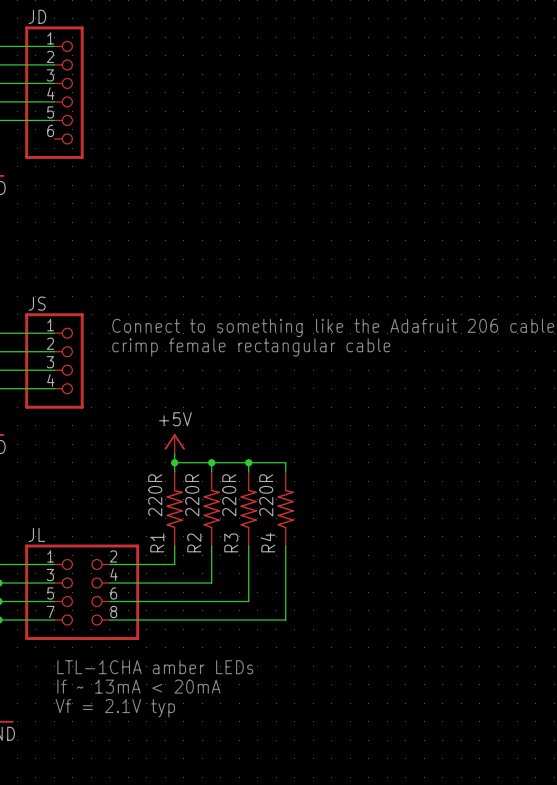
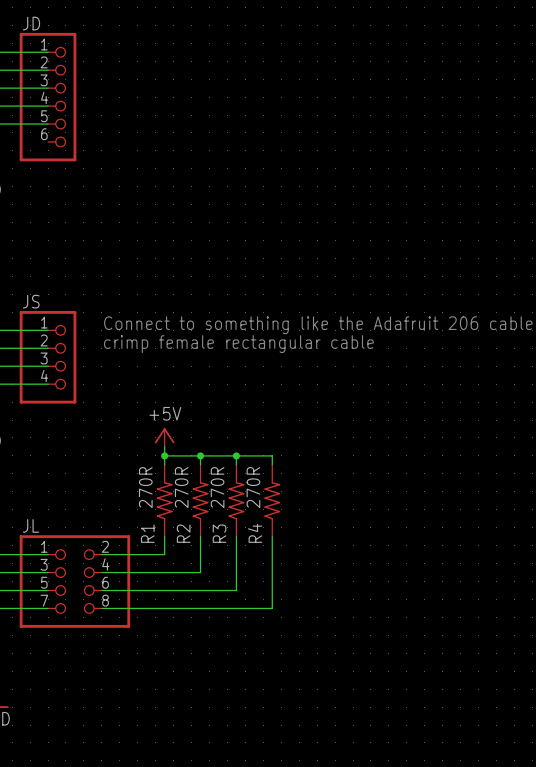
R1 value: 220R (155, 495) -> 270R (145, 487)
R2 value: 220R (192, 495) -> 270R (181, 487)
R3 value: 220R (229, 495) -> 270R (217, 487)
R4 value: 220R (266, 495) -> 270R (253, 487)
text: LTL-1CHA amber LEDs (155, 667) -> none
text: If ~ 13mA < 20mA (138, 686) -> none
text: Vf = 2.1V typ (115, 708) -> none

